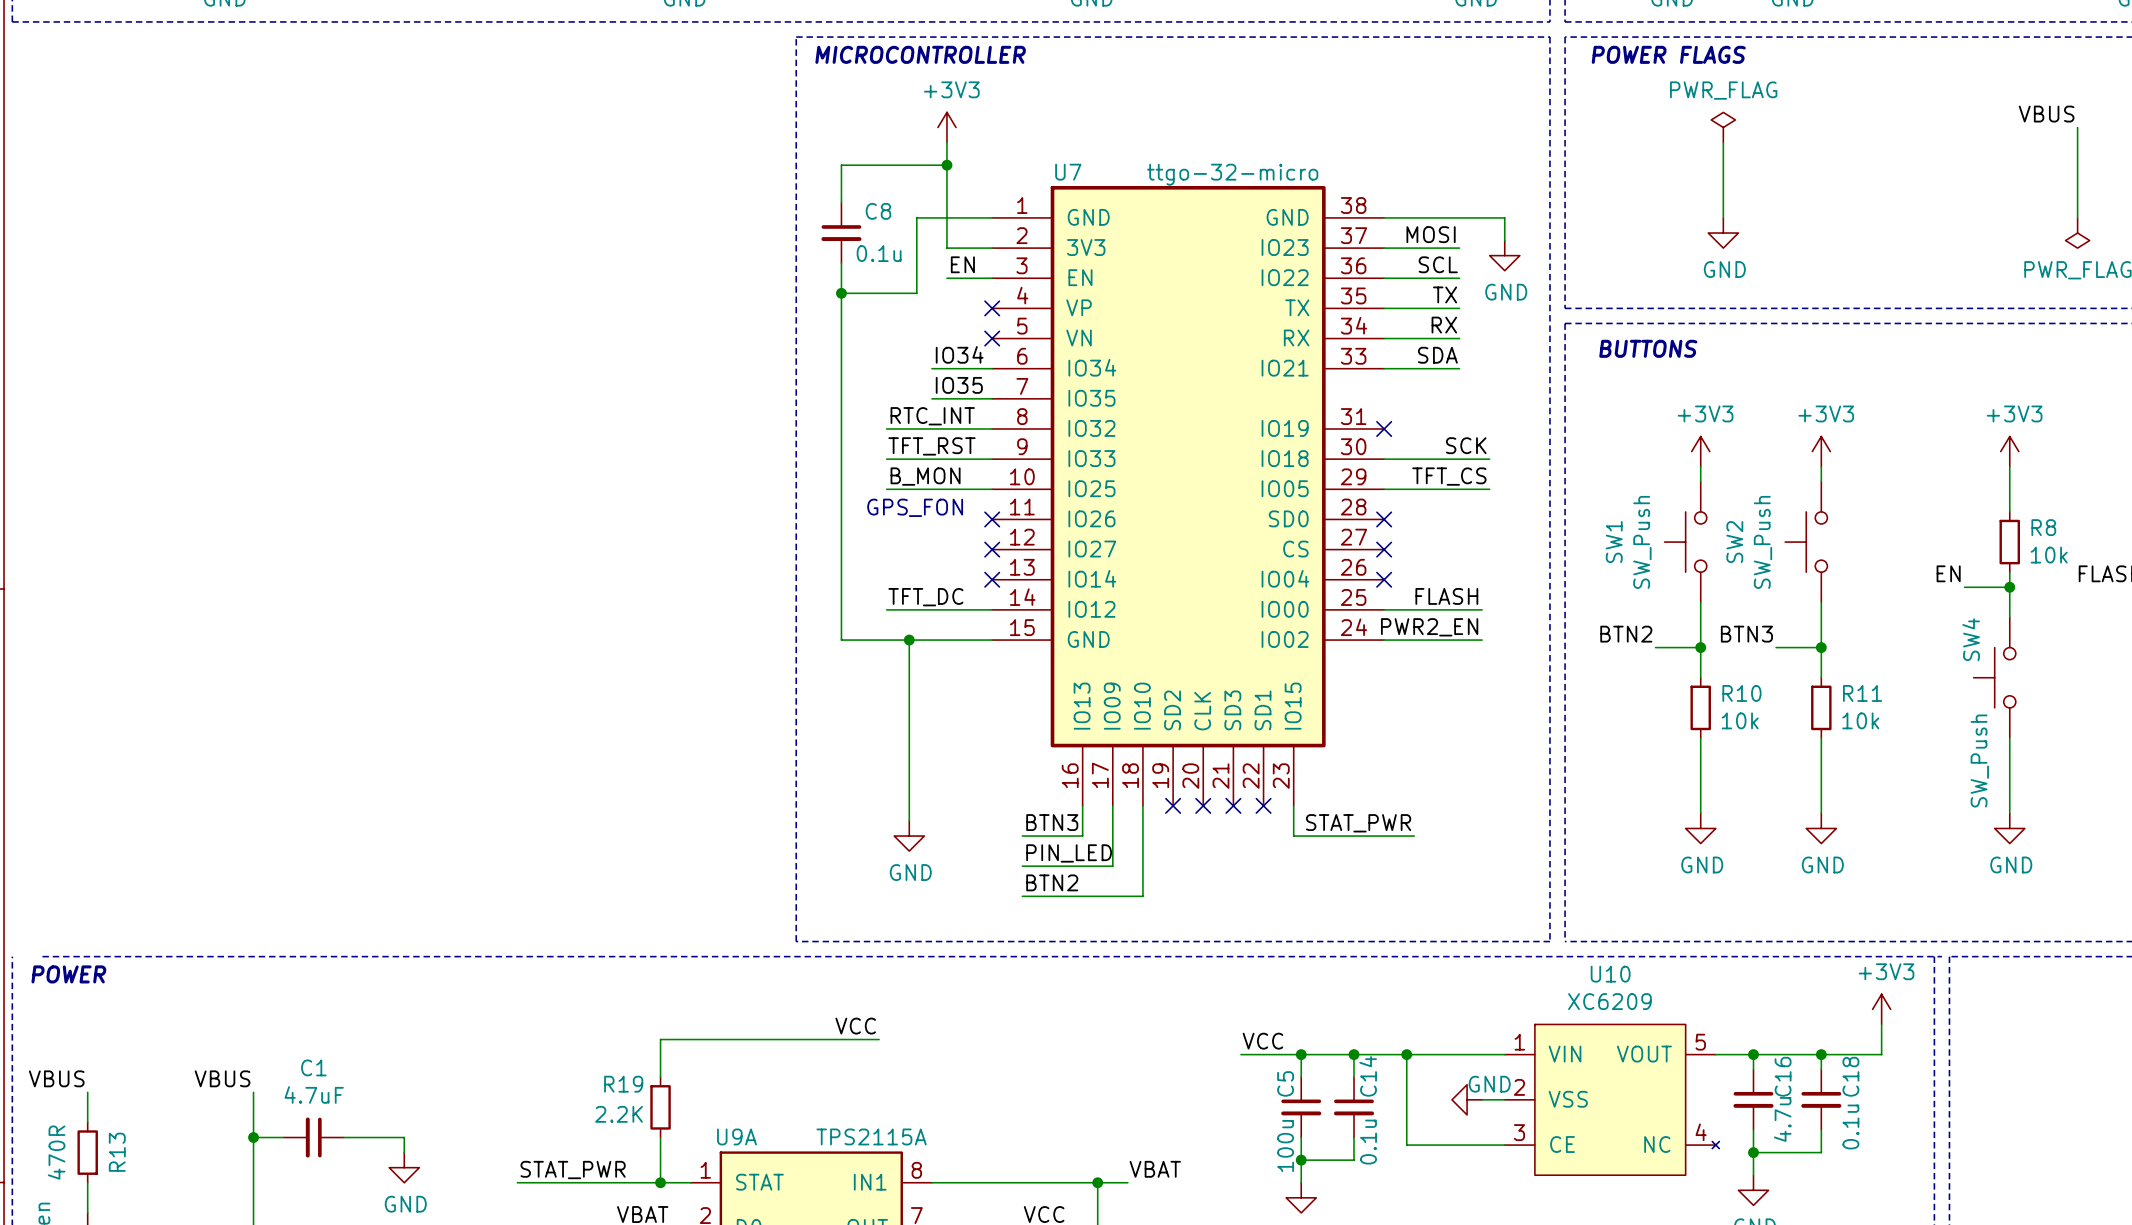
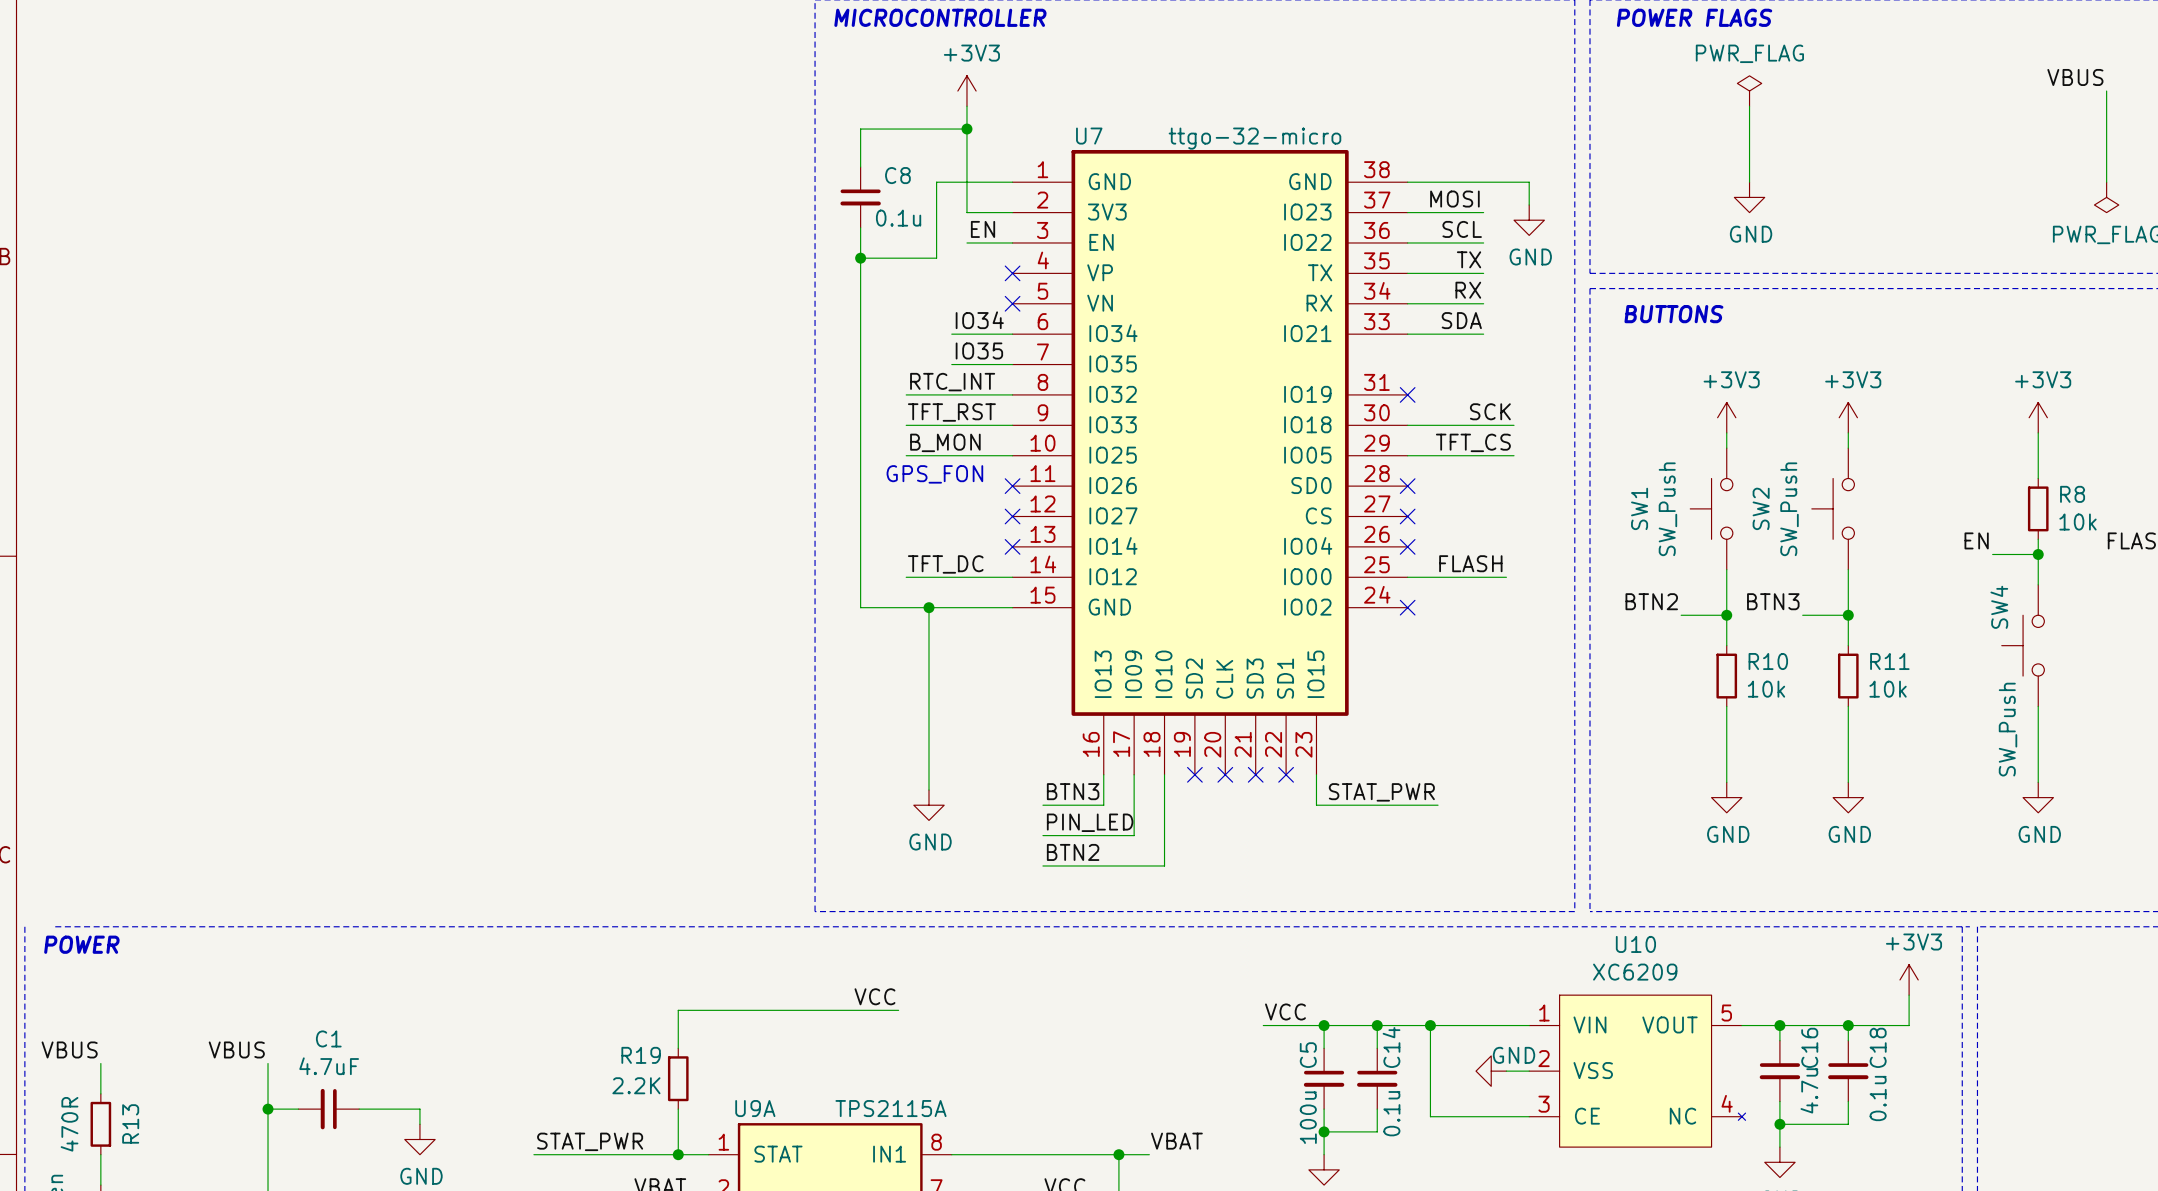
label: PWR2_EN (1429, 627) -> none
wire: (1384, 640) (1482, 640) -> none
no-connect mark: none -> (1407, 607)

